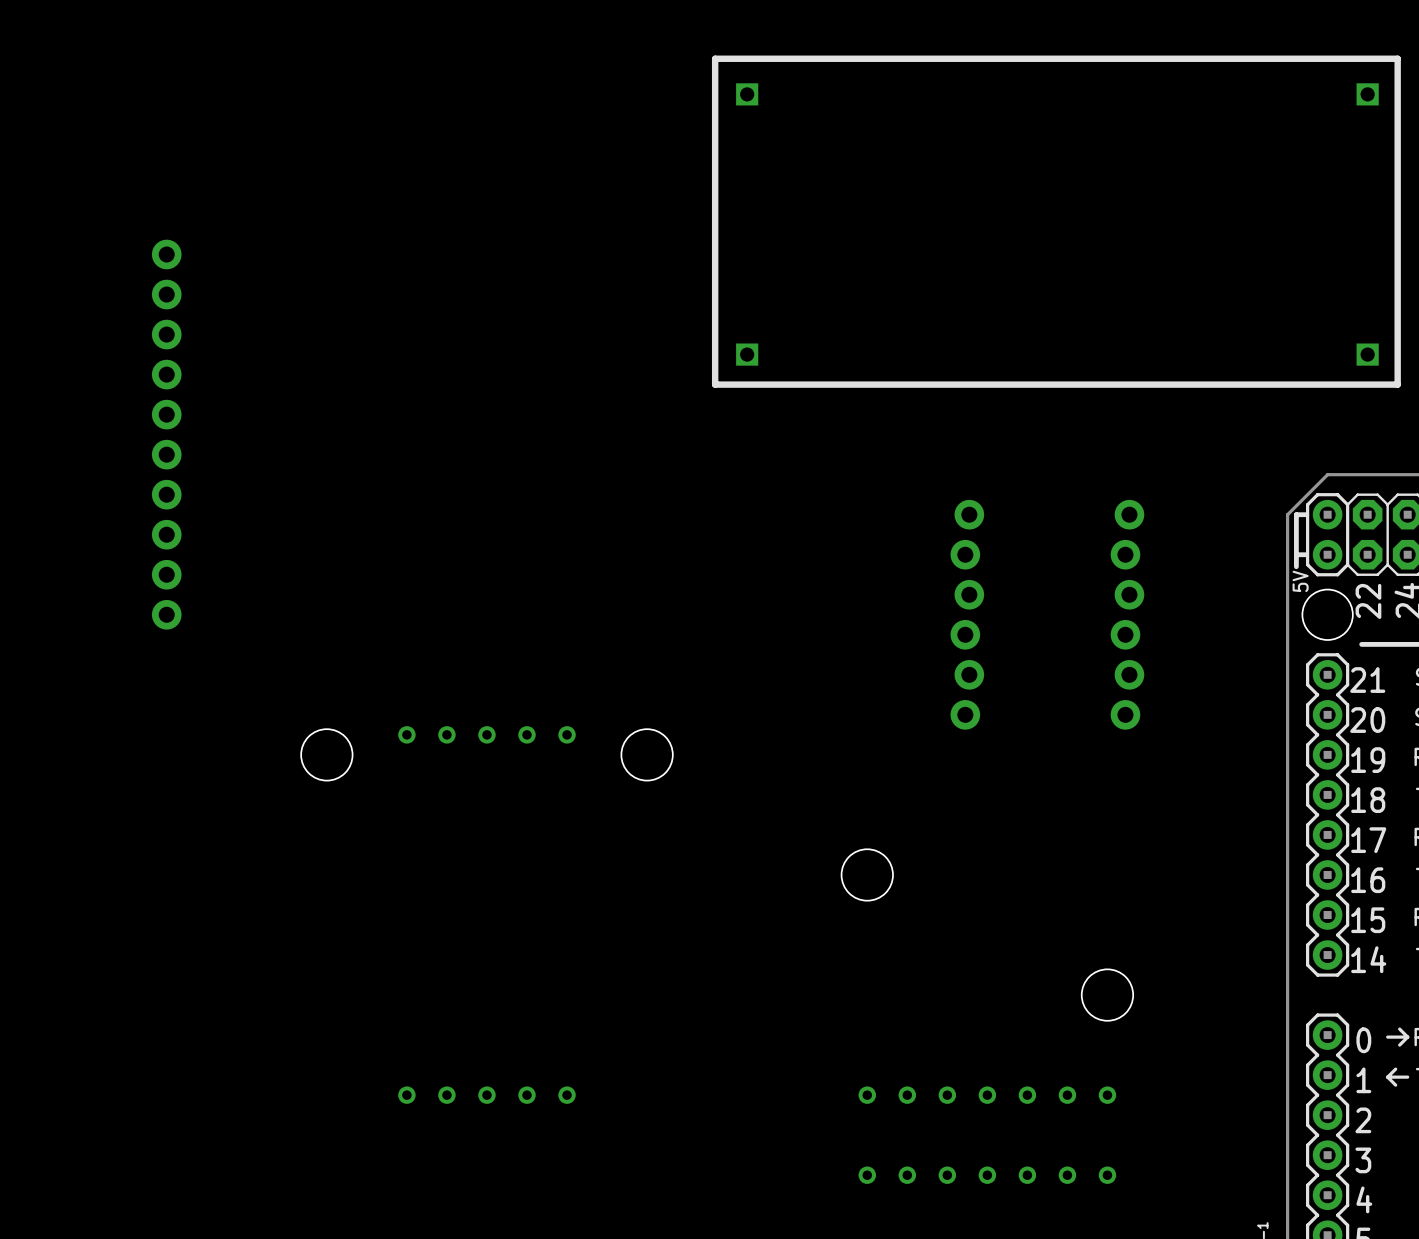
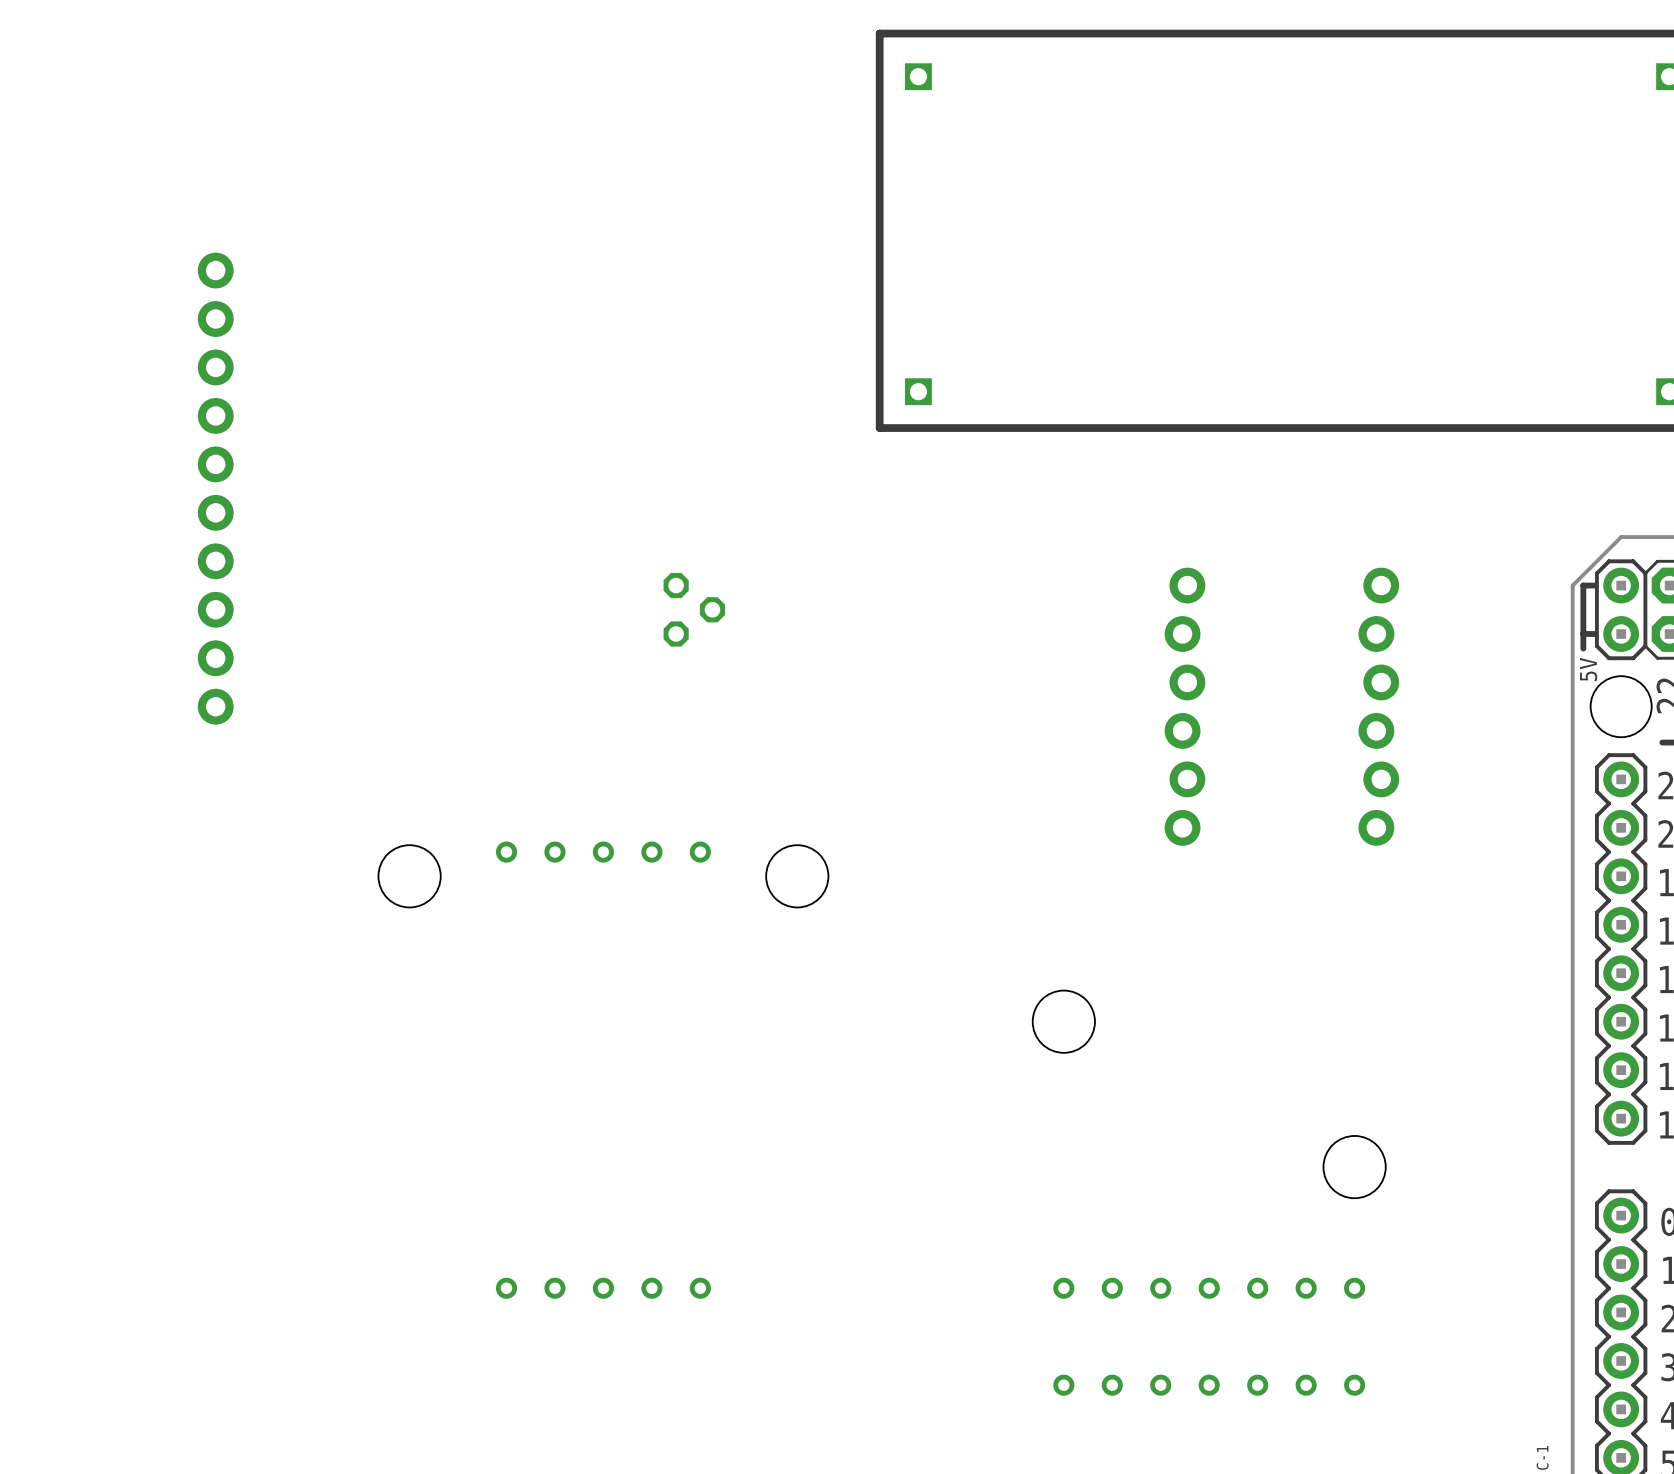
part: none -> (694, 609)

